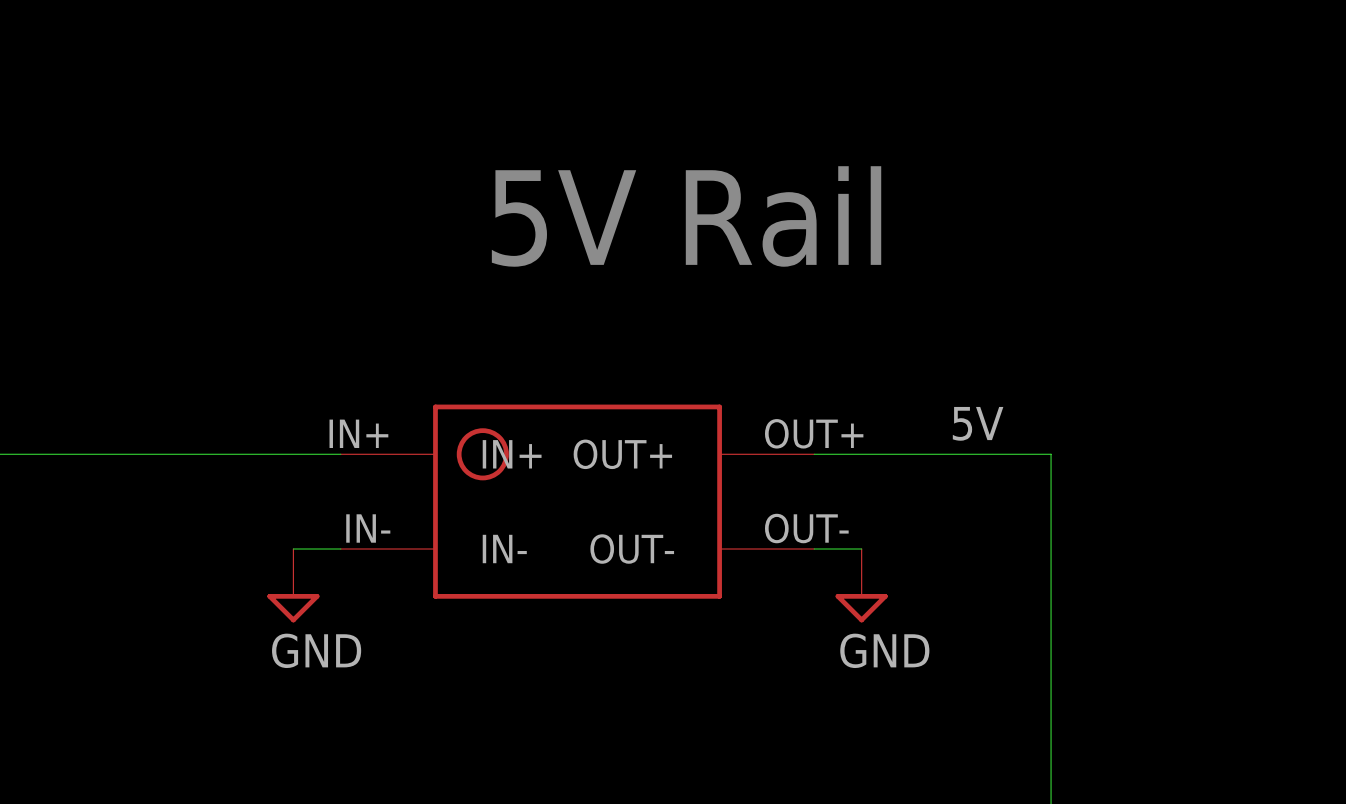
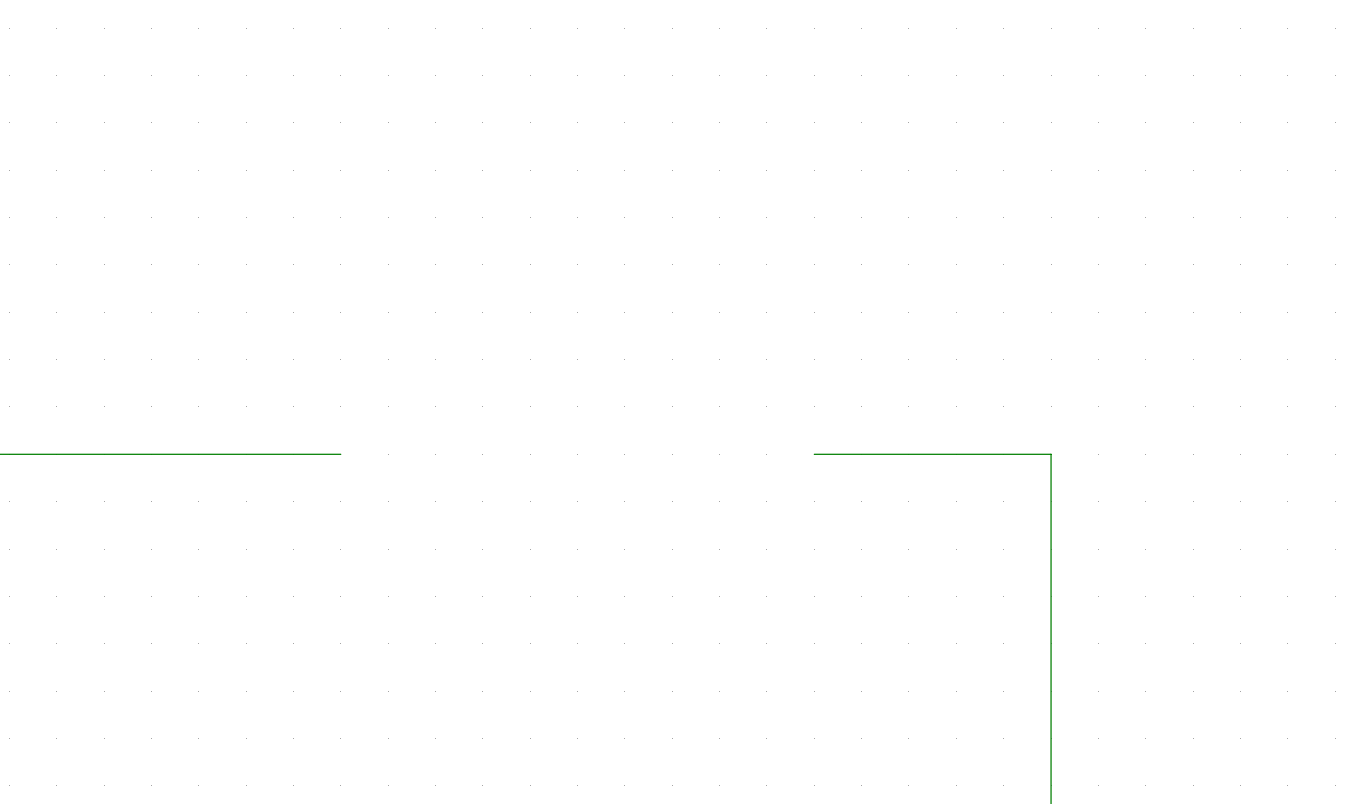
text: 5V Rail (686, 216) -> none
label: 5V (978, 423) -> none
part: (577, 501) -> none
wire: (293, 549) (340, 549) -> none
wire: (814, 549) (861, 549) -> none
power symbol: GND (293, 585) -> none
power symbol: GND (861, 585) -> none

